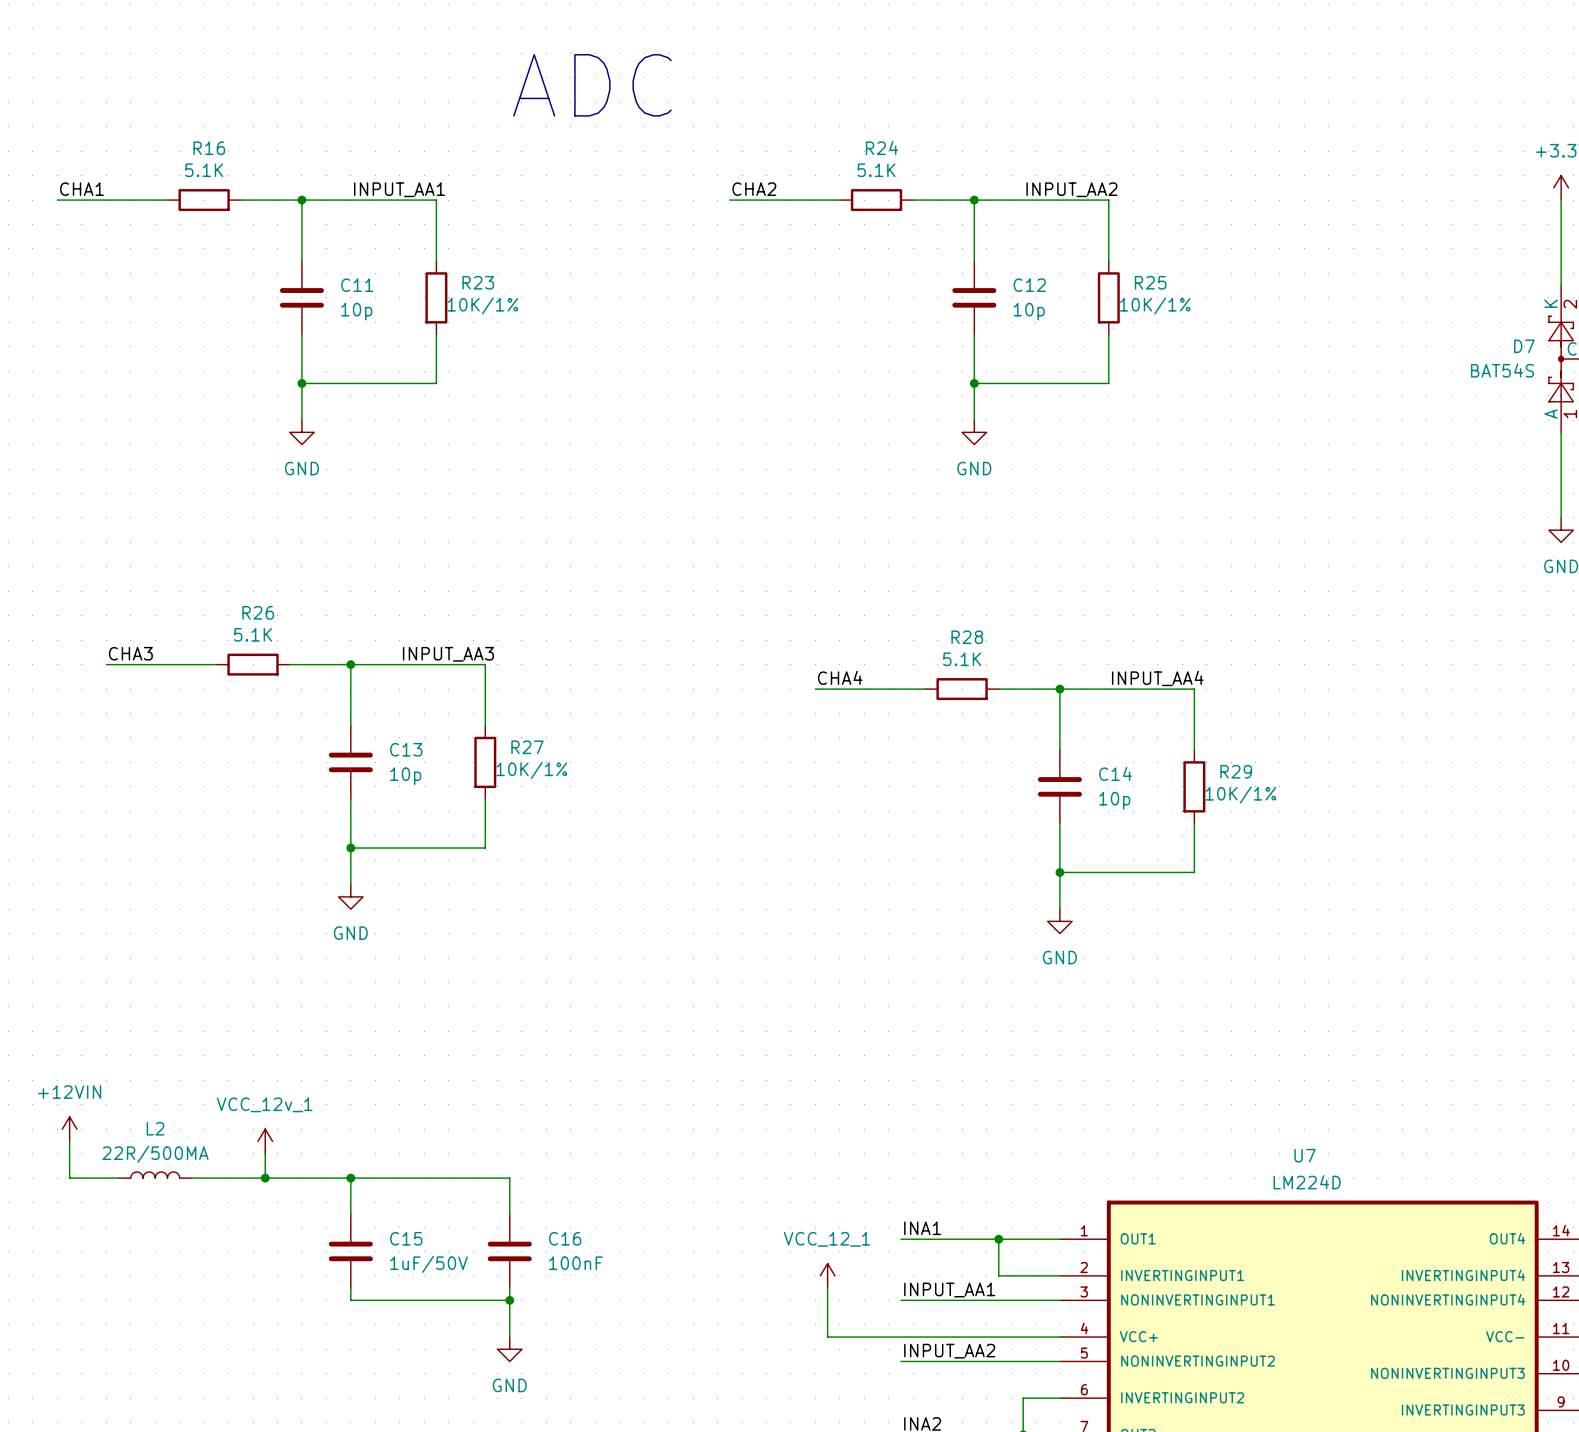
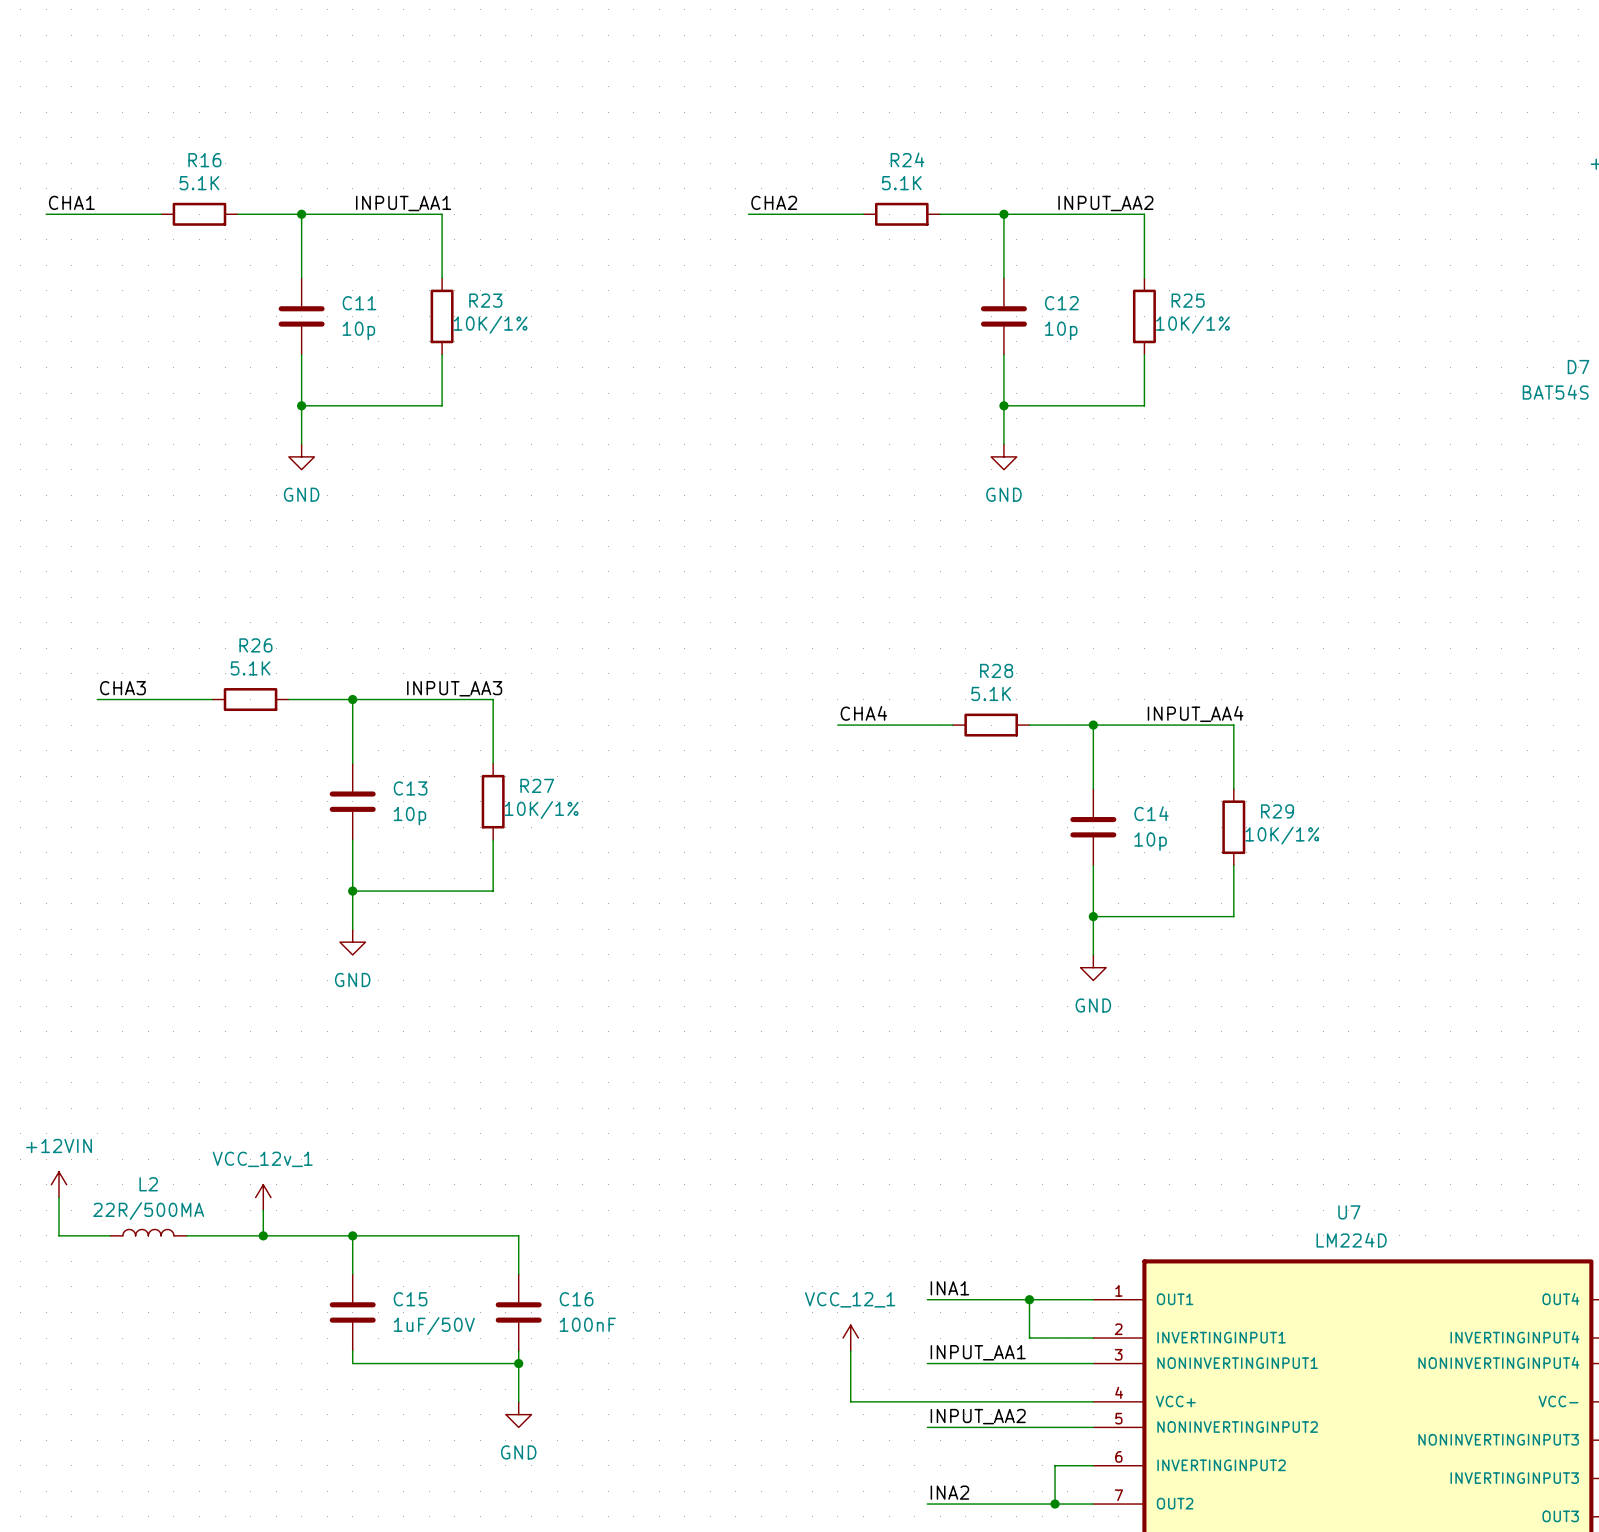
text: ADC (592, 85) -> none

